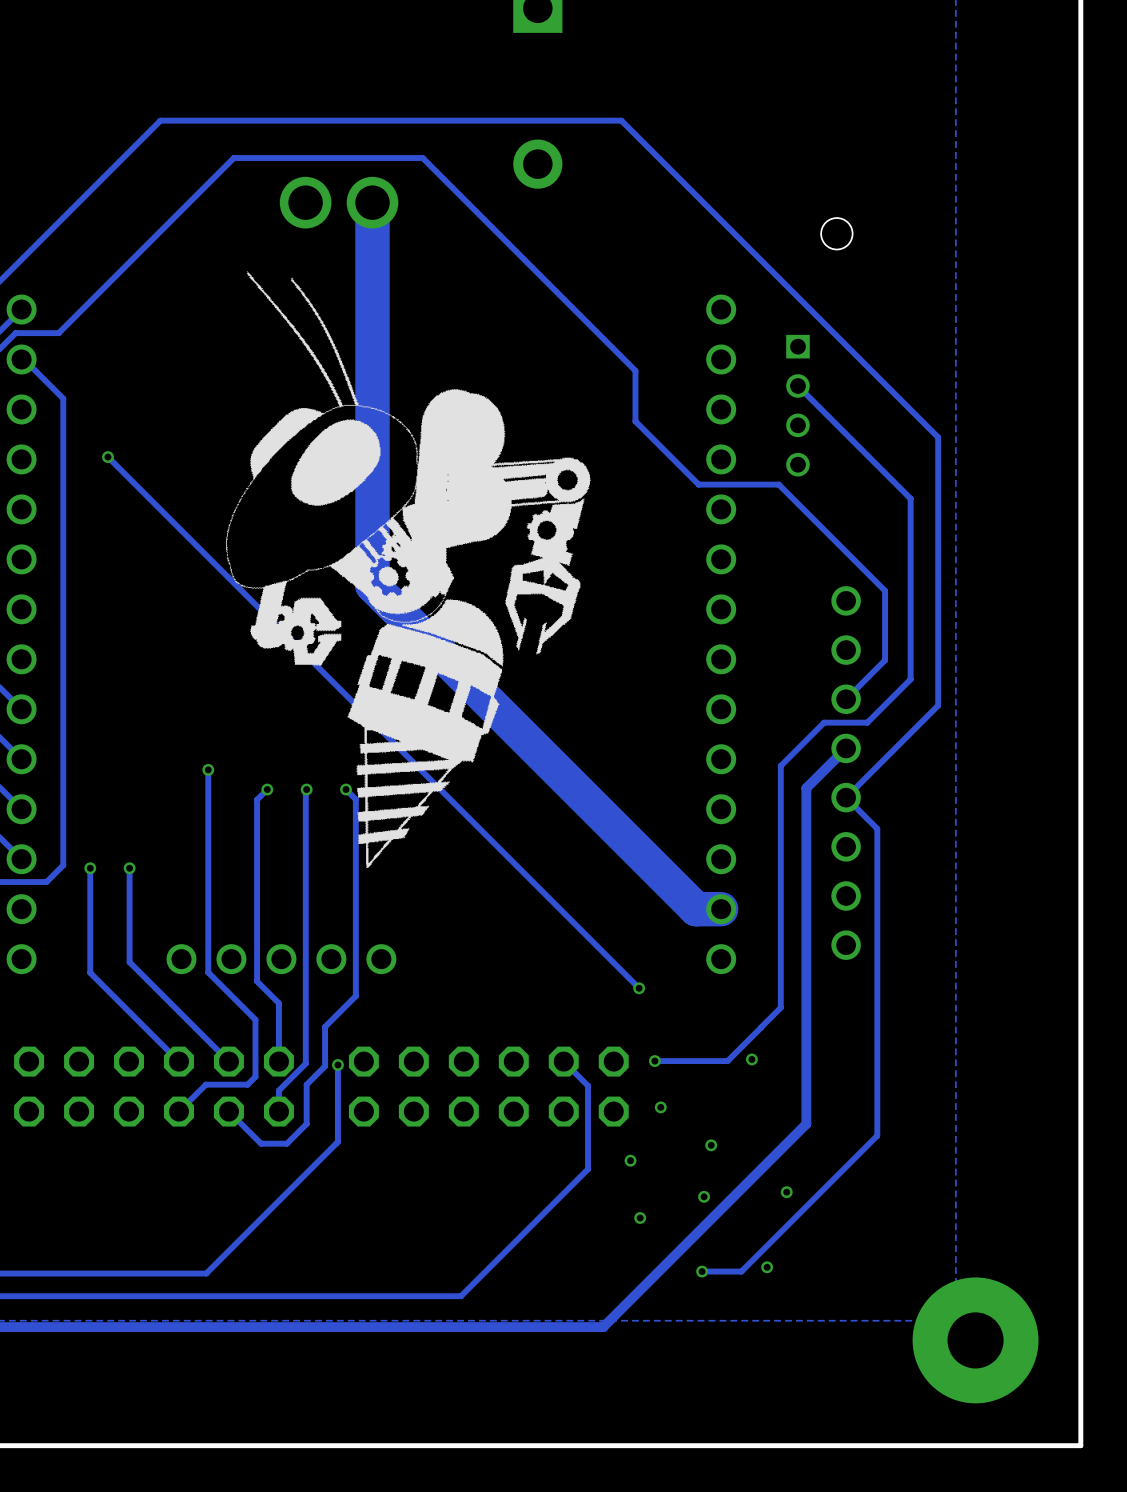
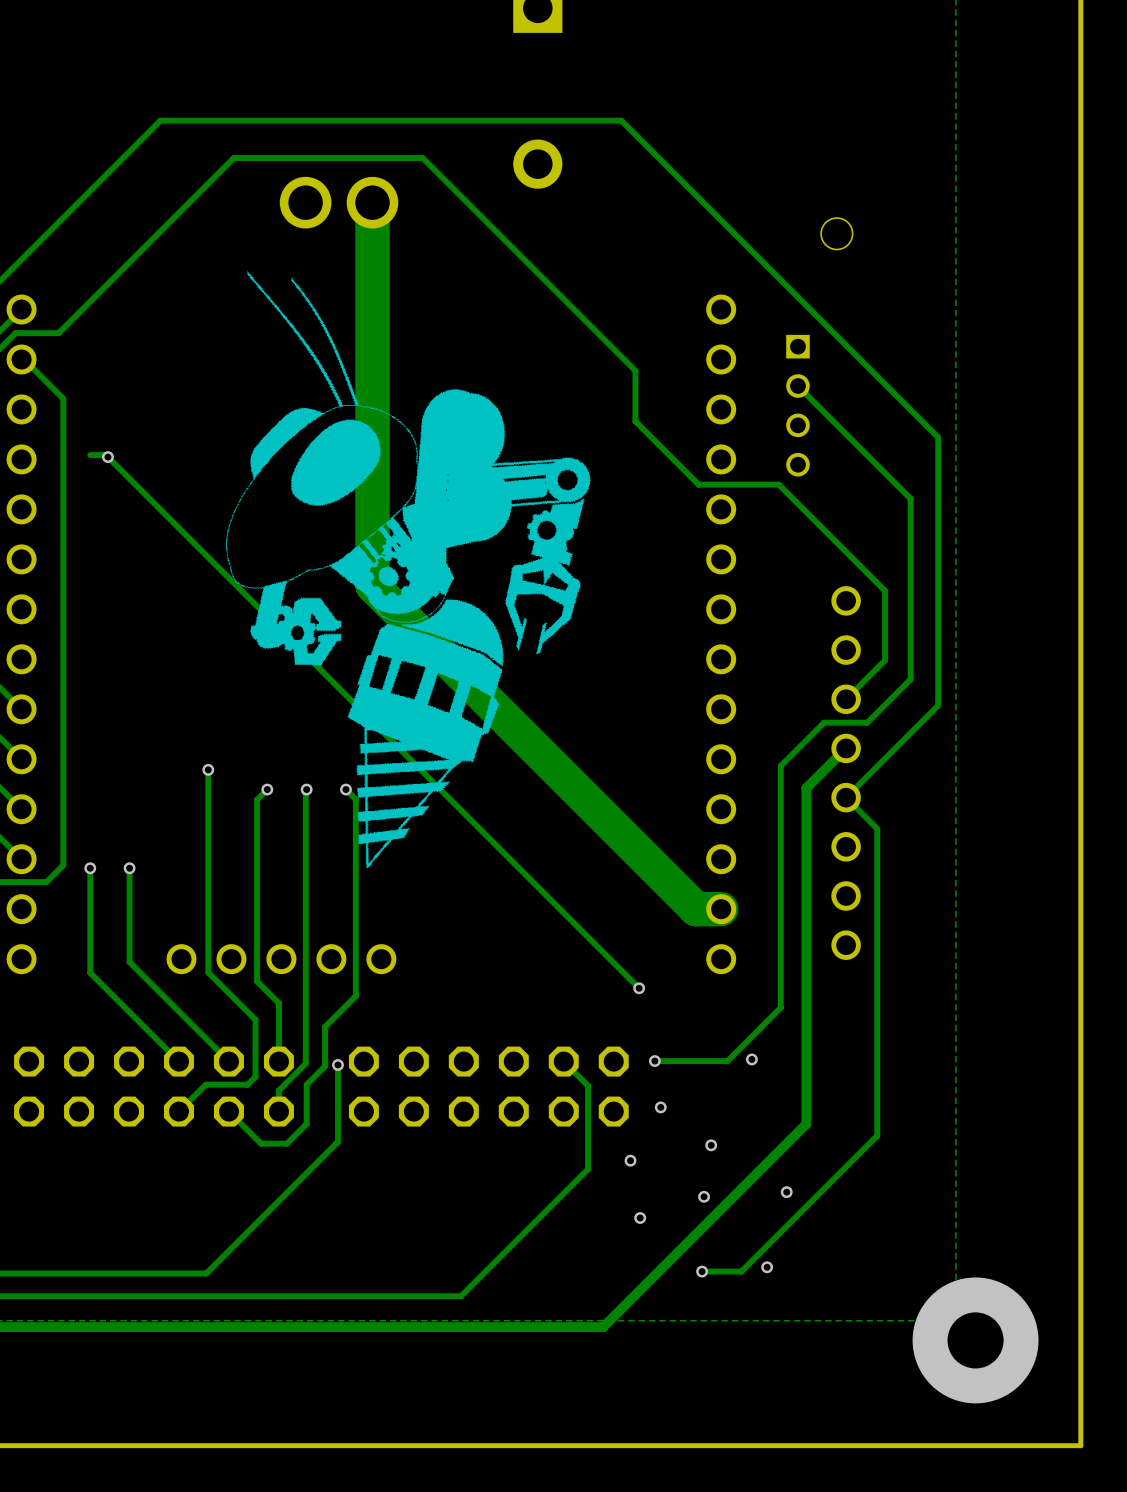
track: none -> (90, 455) (105, 455) (107, 457)

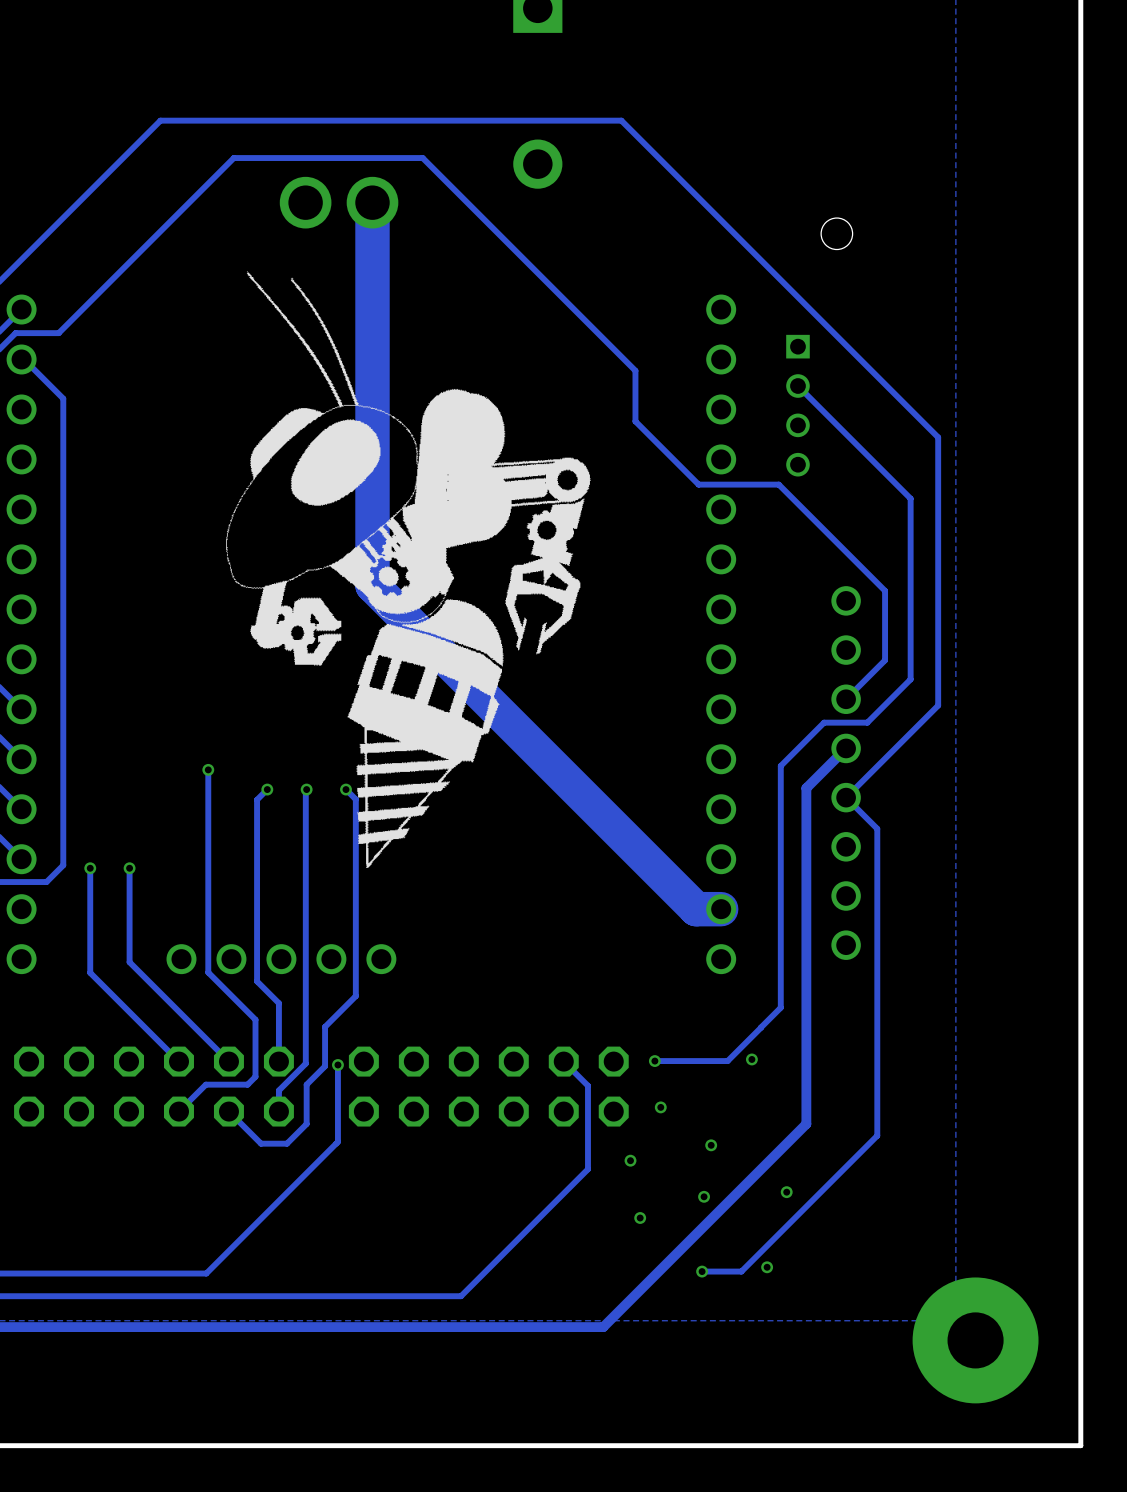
track: (90, 455) (105, 455) (639, 988) -> none
via: (107, 457) -> none
via: (639, 988) -> none

